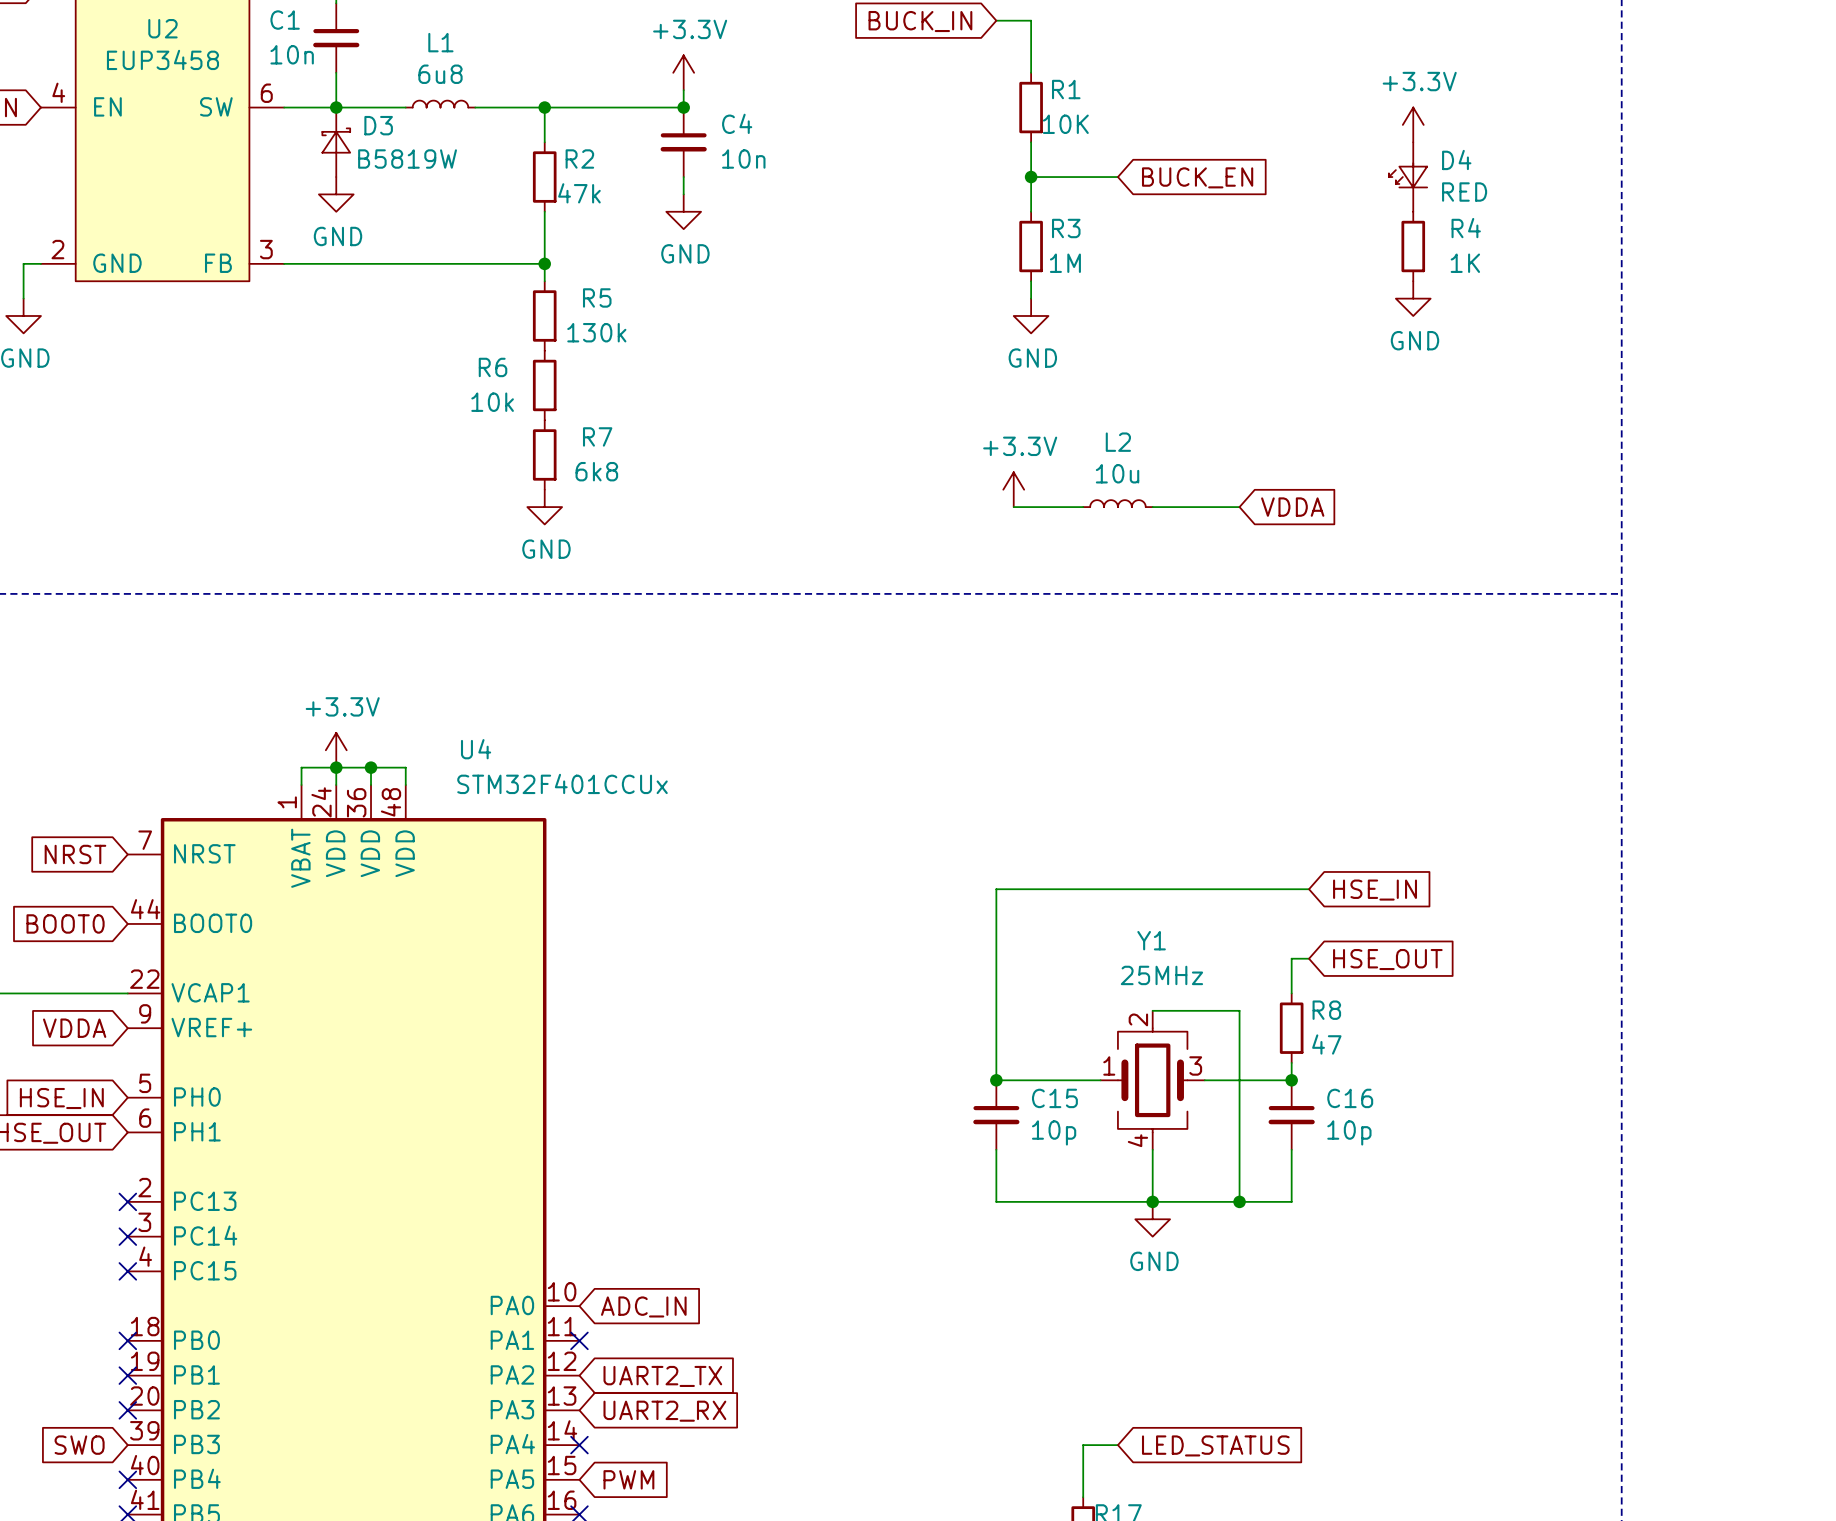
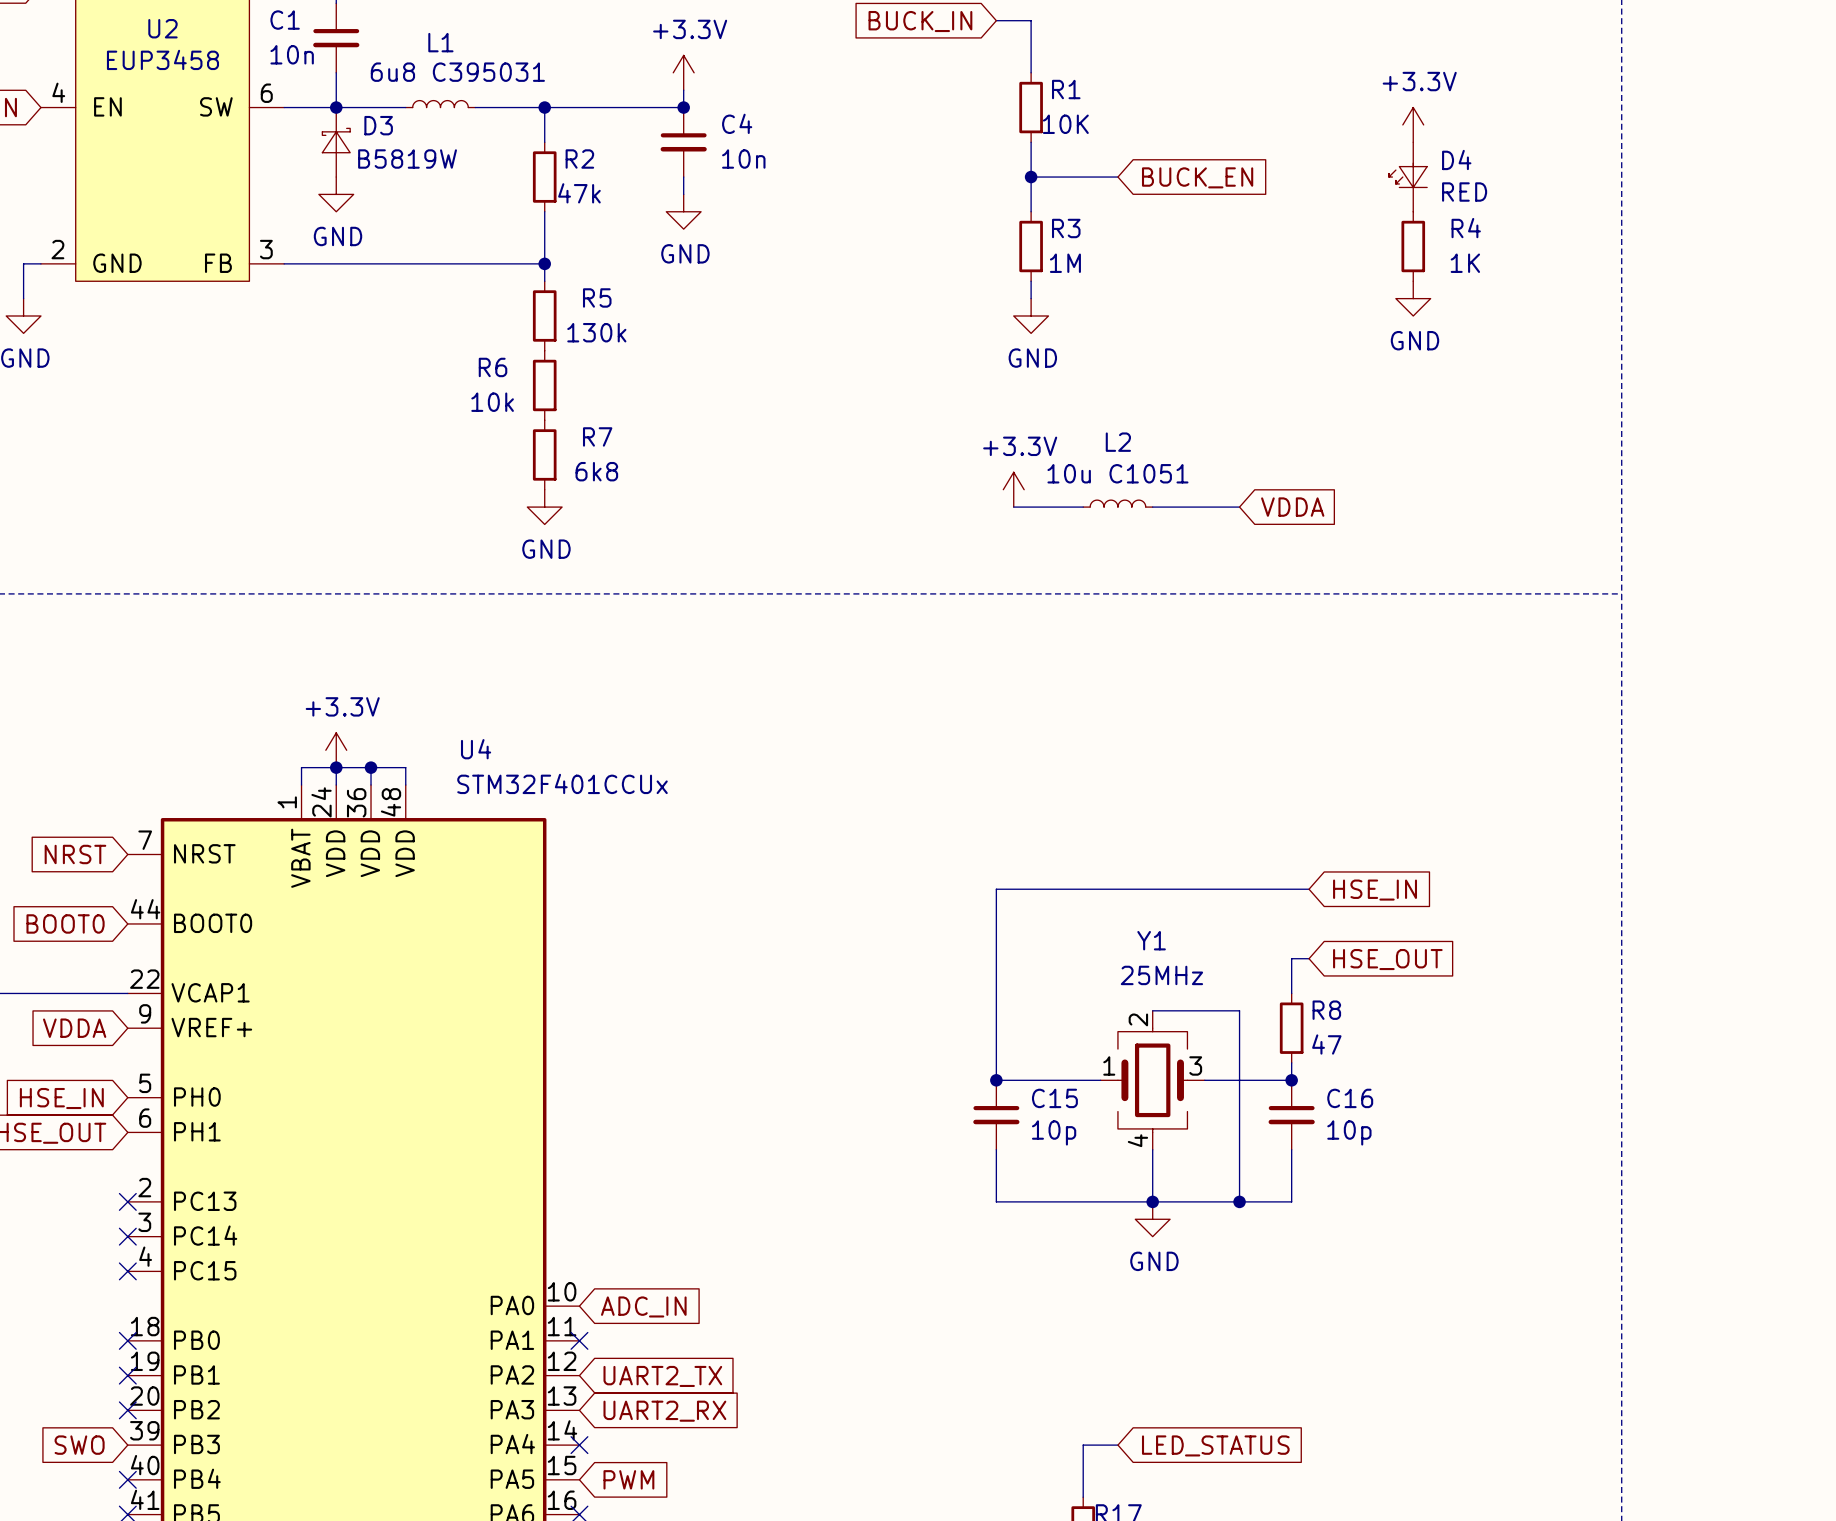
L1 value: 6u8 (440, 74) -> 6u8 C395031 (457, 72)
L2 value: 10u (1117, 473) -> 10u C1051 (1117, 473)

